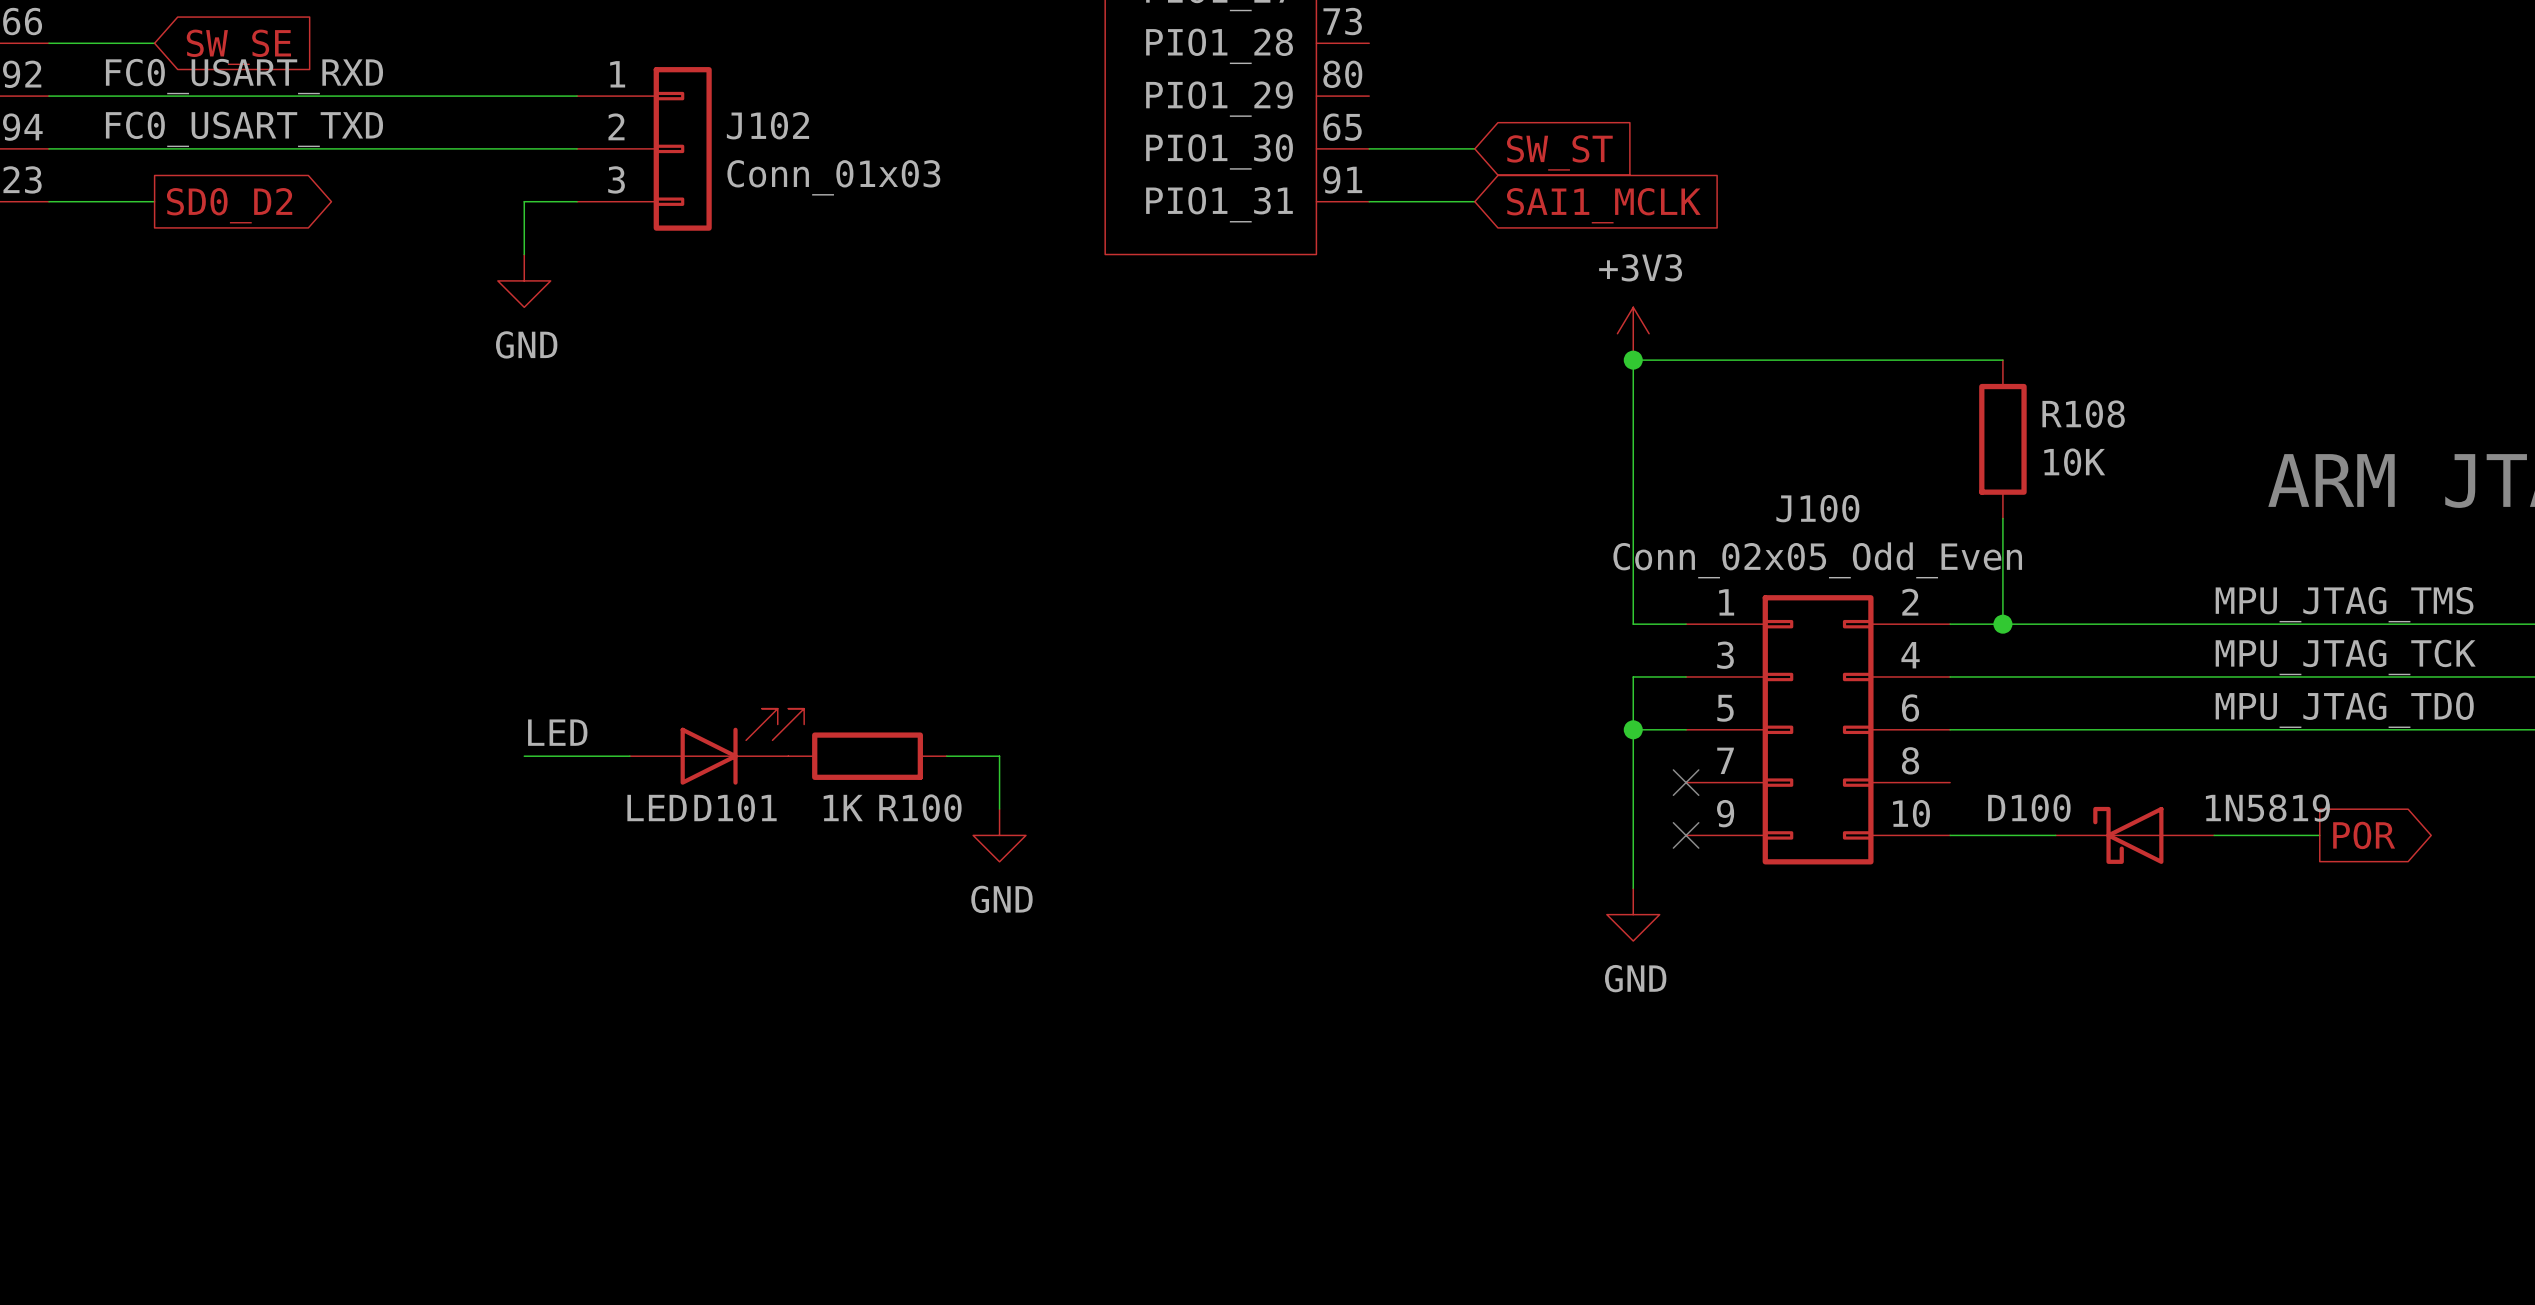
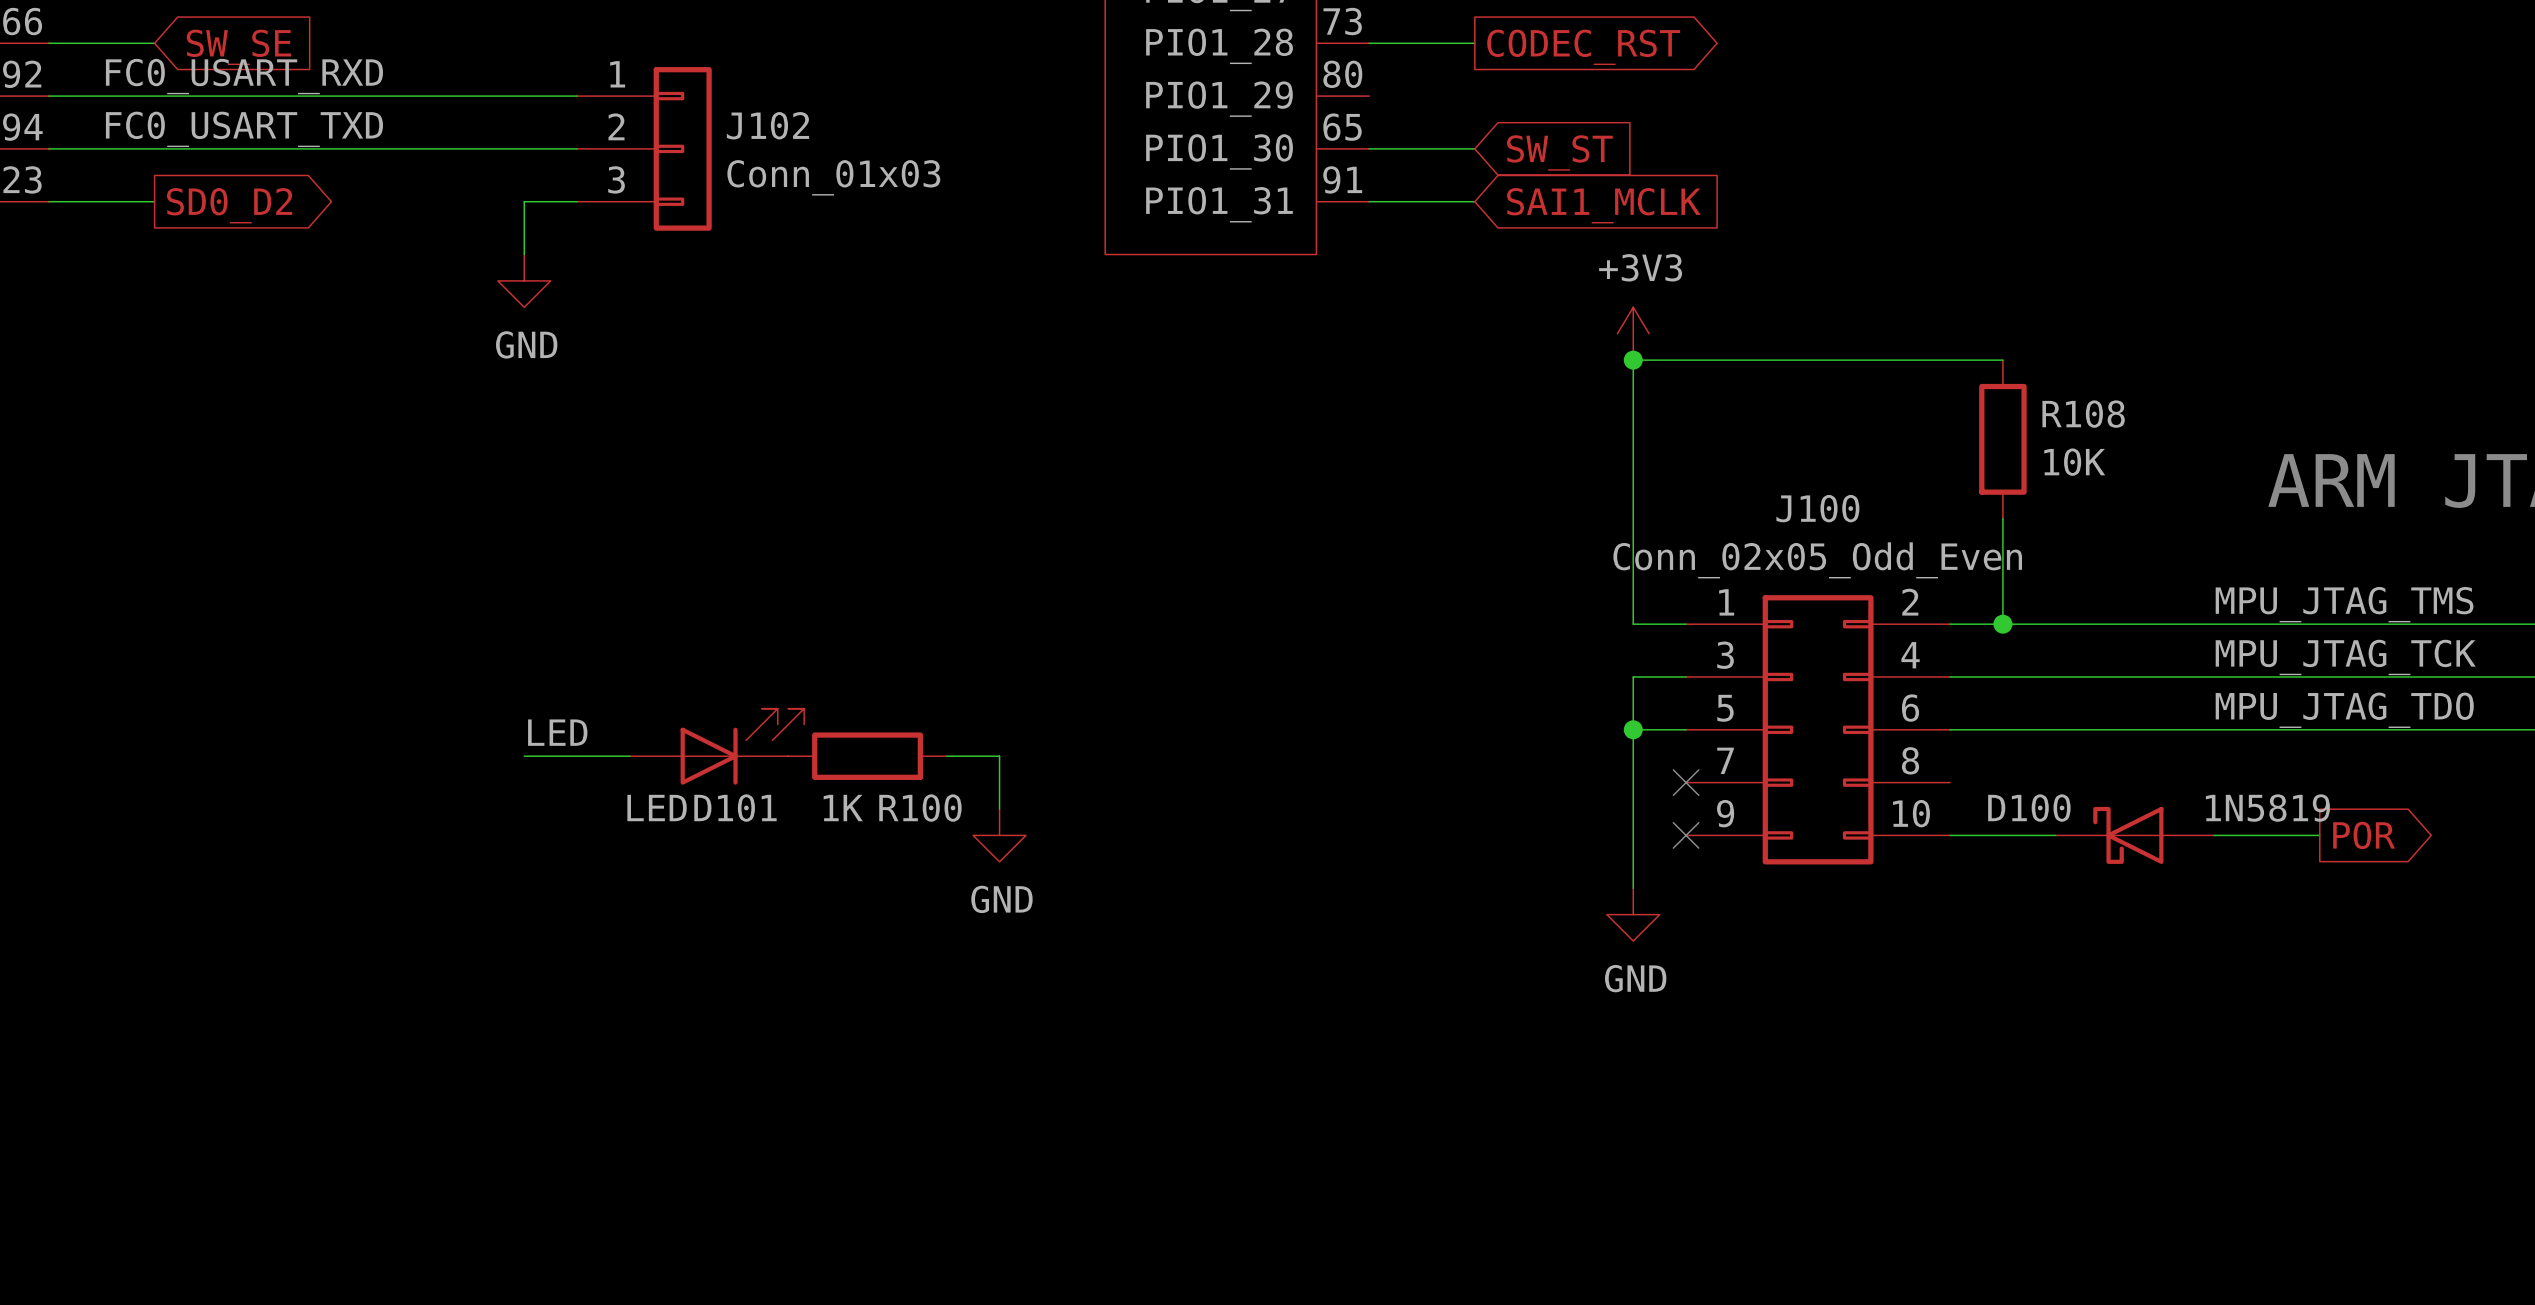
wire: none -> (1369, 43) (1474, 43)
global label: none -> CODEC_RST (1583, 47)

